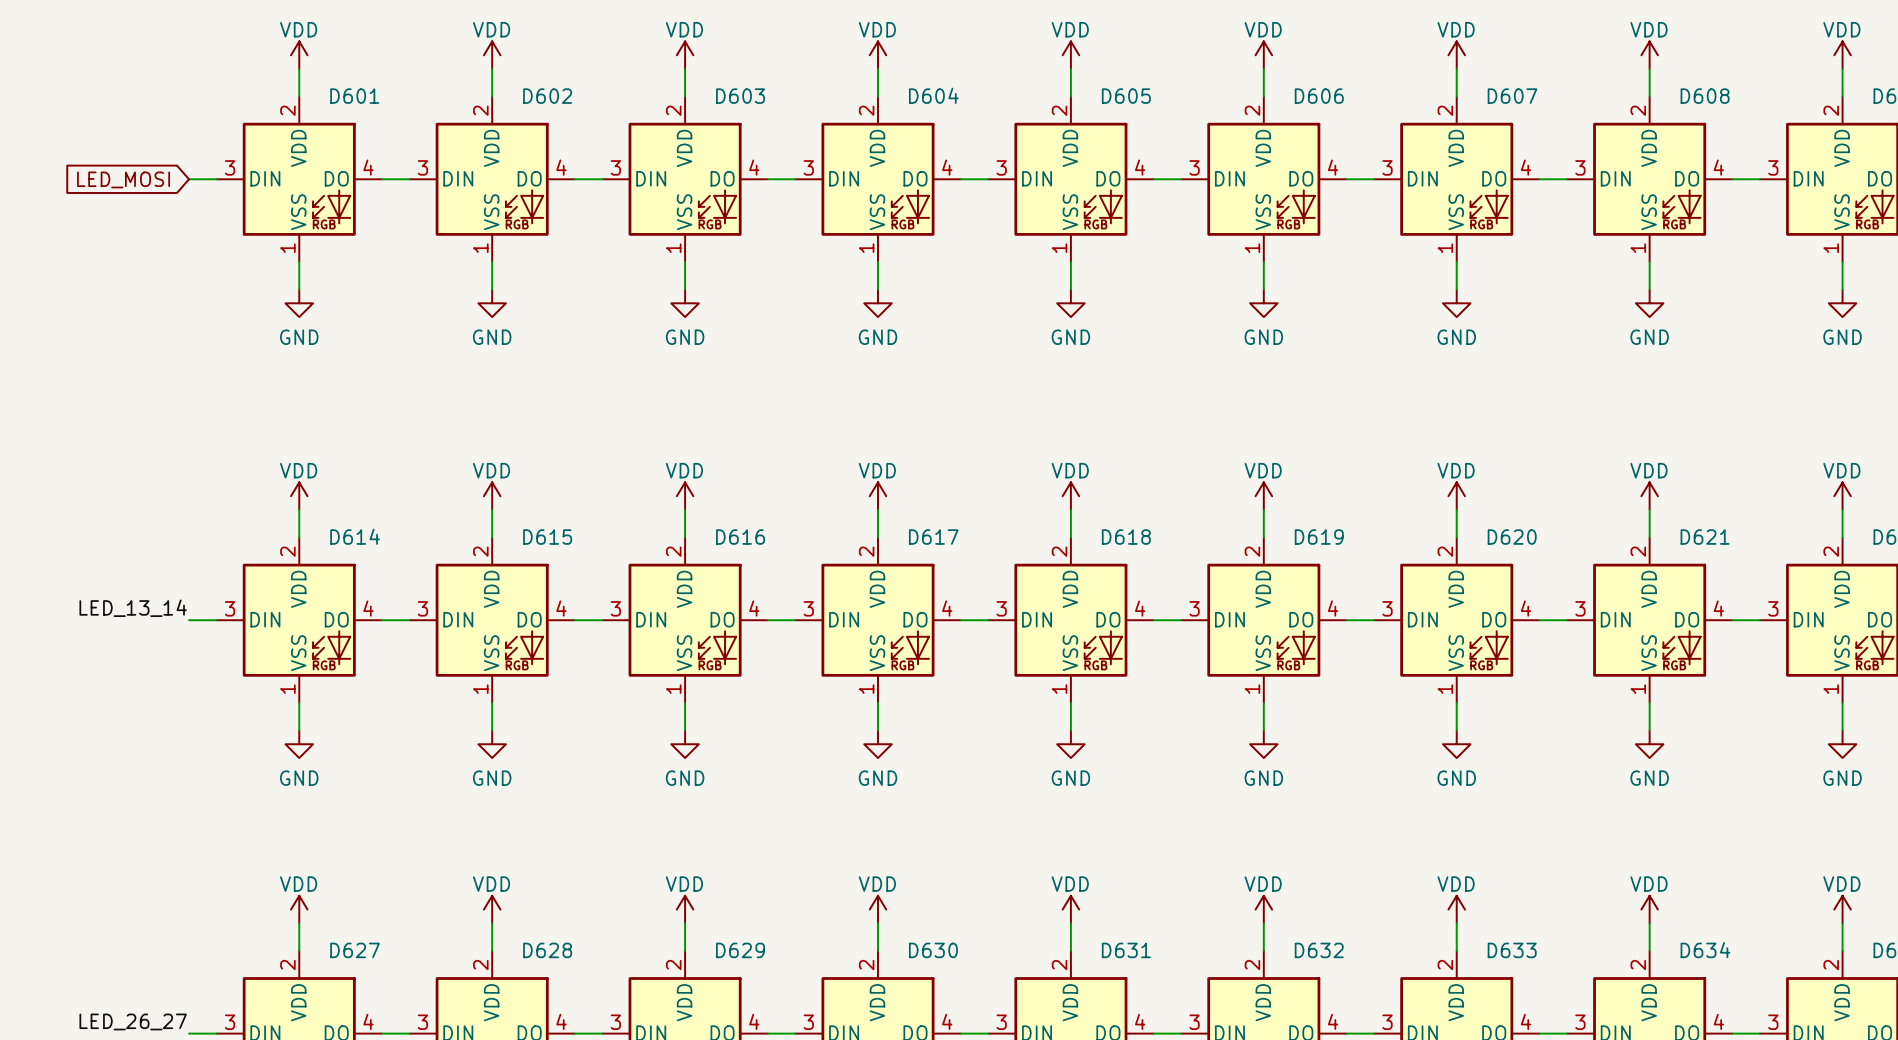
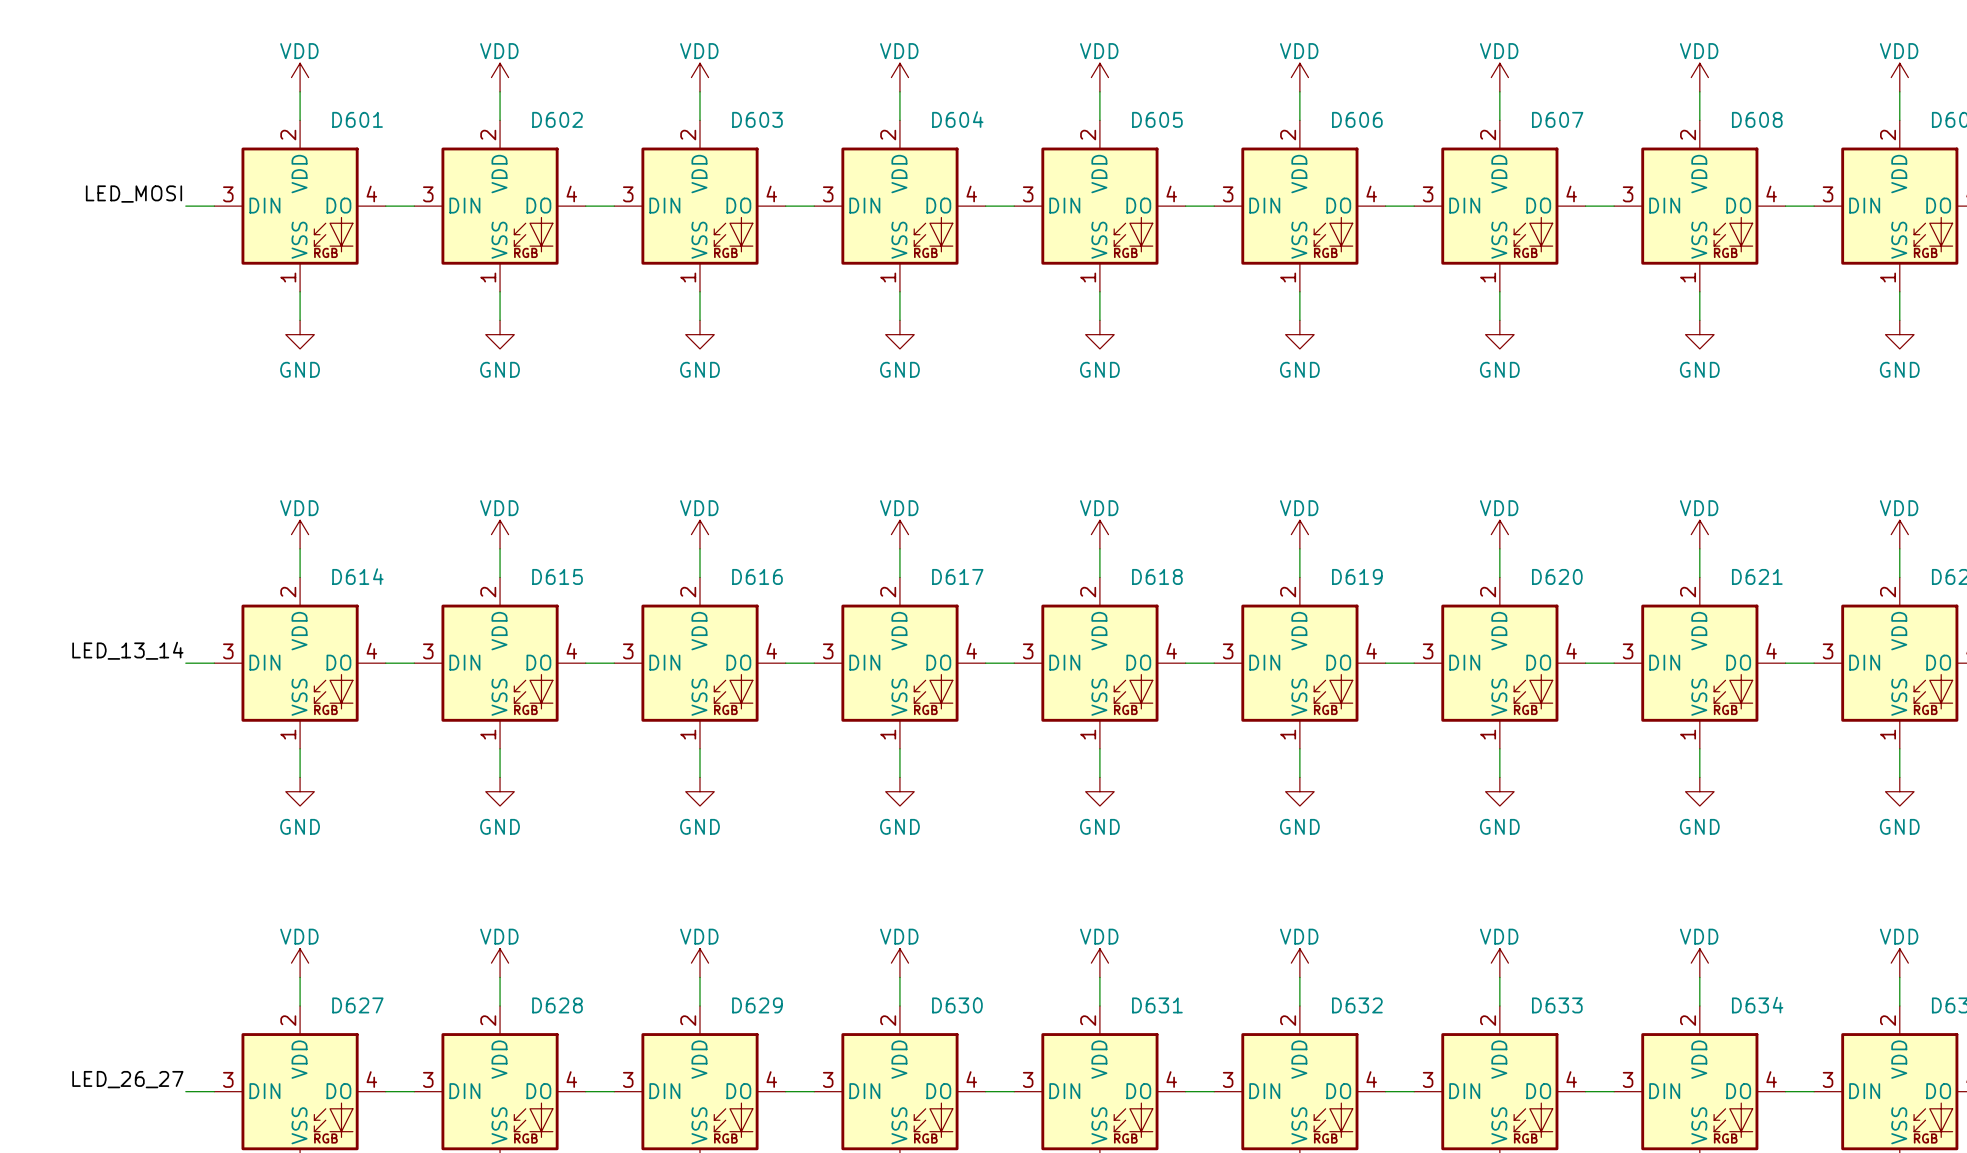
label: none -> LED_MOSI (134, 194)
global label: LED_MOSI (123, 179) -> none

